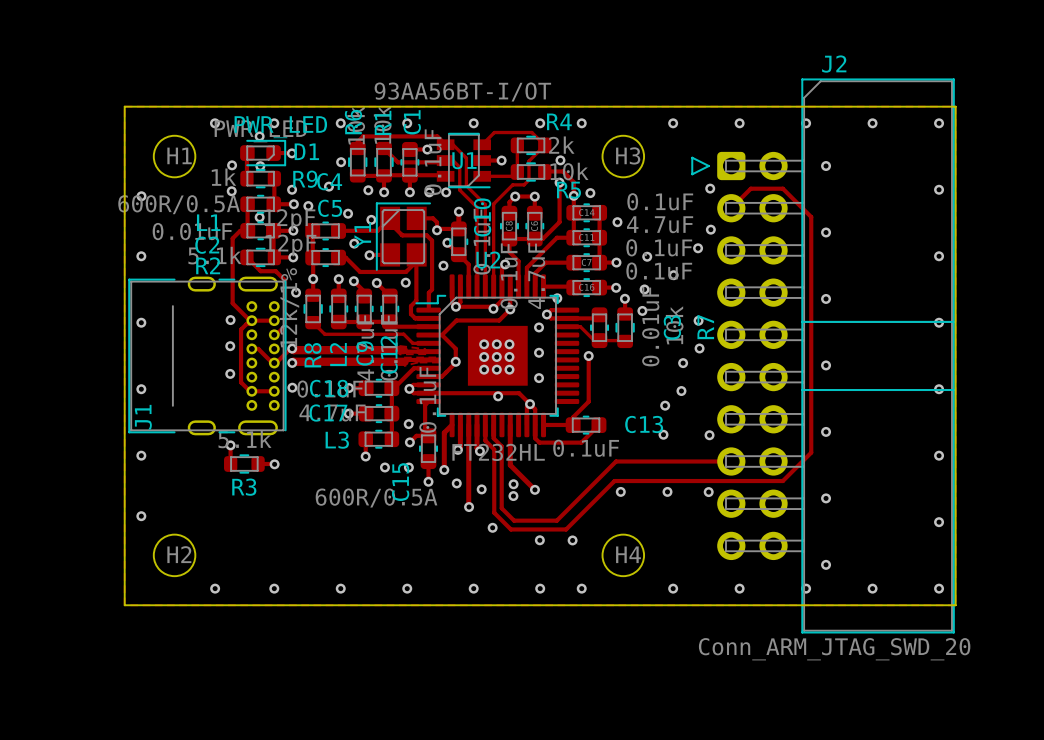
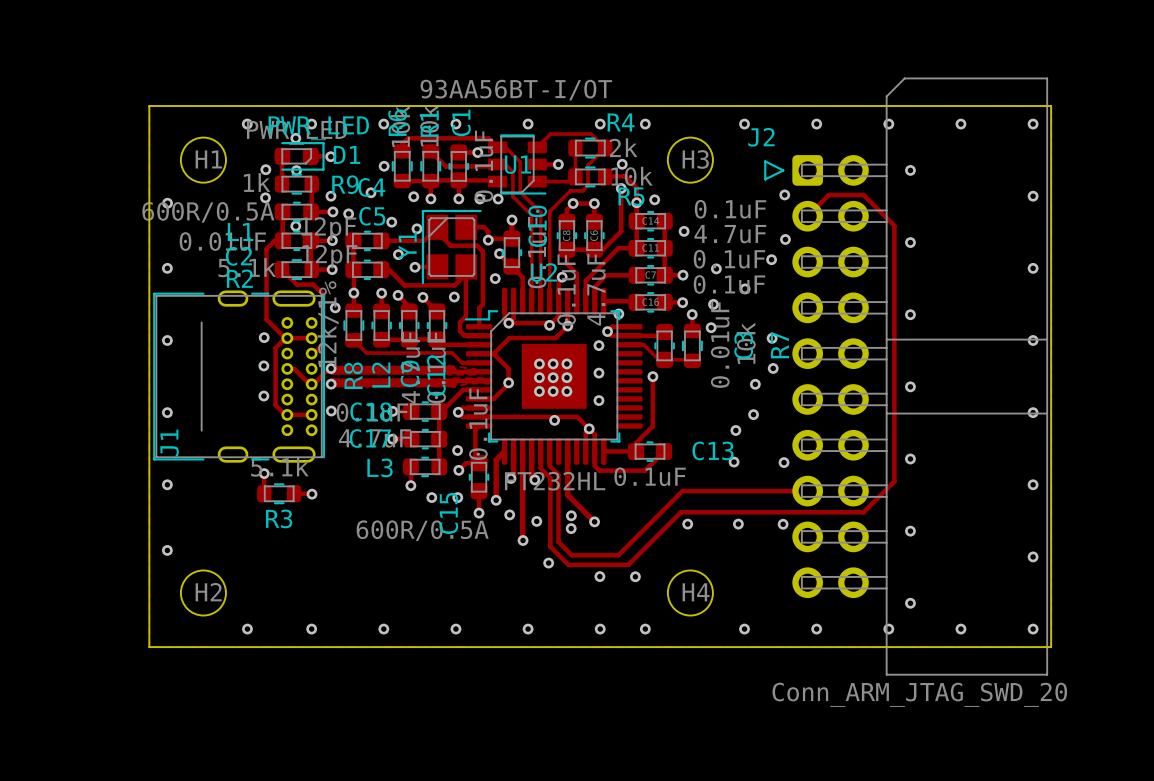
J2 name position: J2 (834, 64) -> J2 (761, 137)
J2 footprint: [691, 78, 955, 634] -> [764, 77, 1049, 676]

